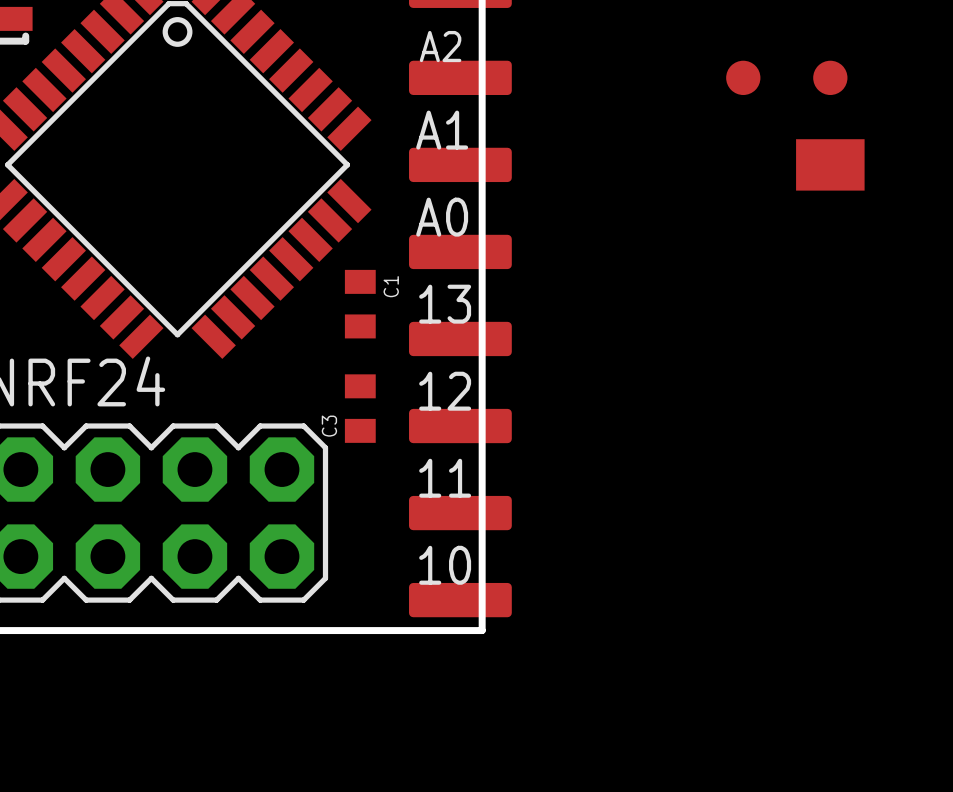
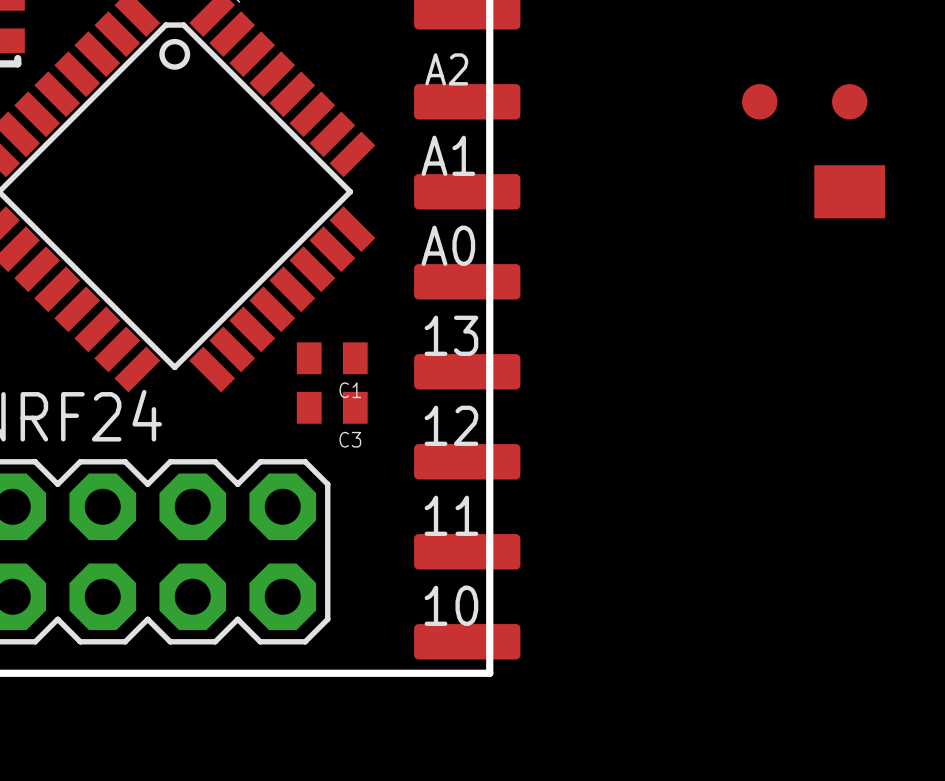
C1 rotation: 0° (360, 304) -> 90° clockwise (332, 358)
C3 rotation: 0° (360, 408) -> 90° clockwise (332, 407)
C3 position: (360, 408) -> (332, 407)

